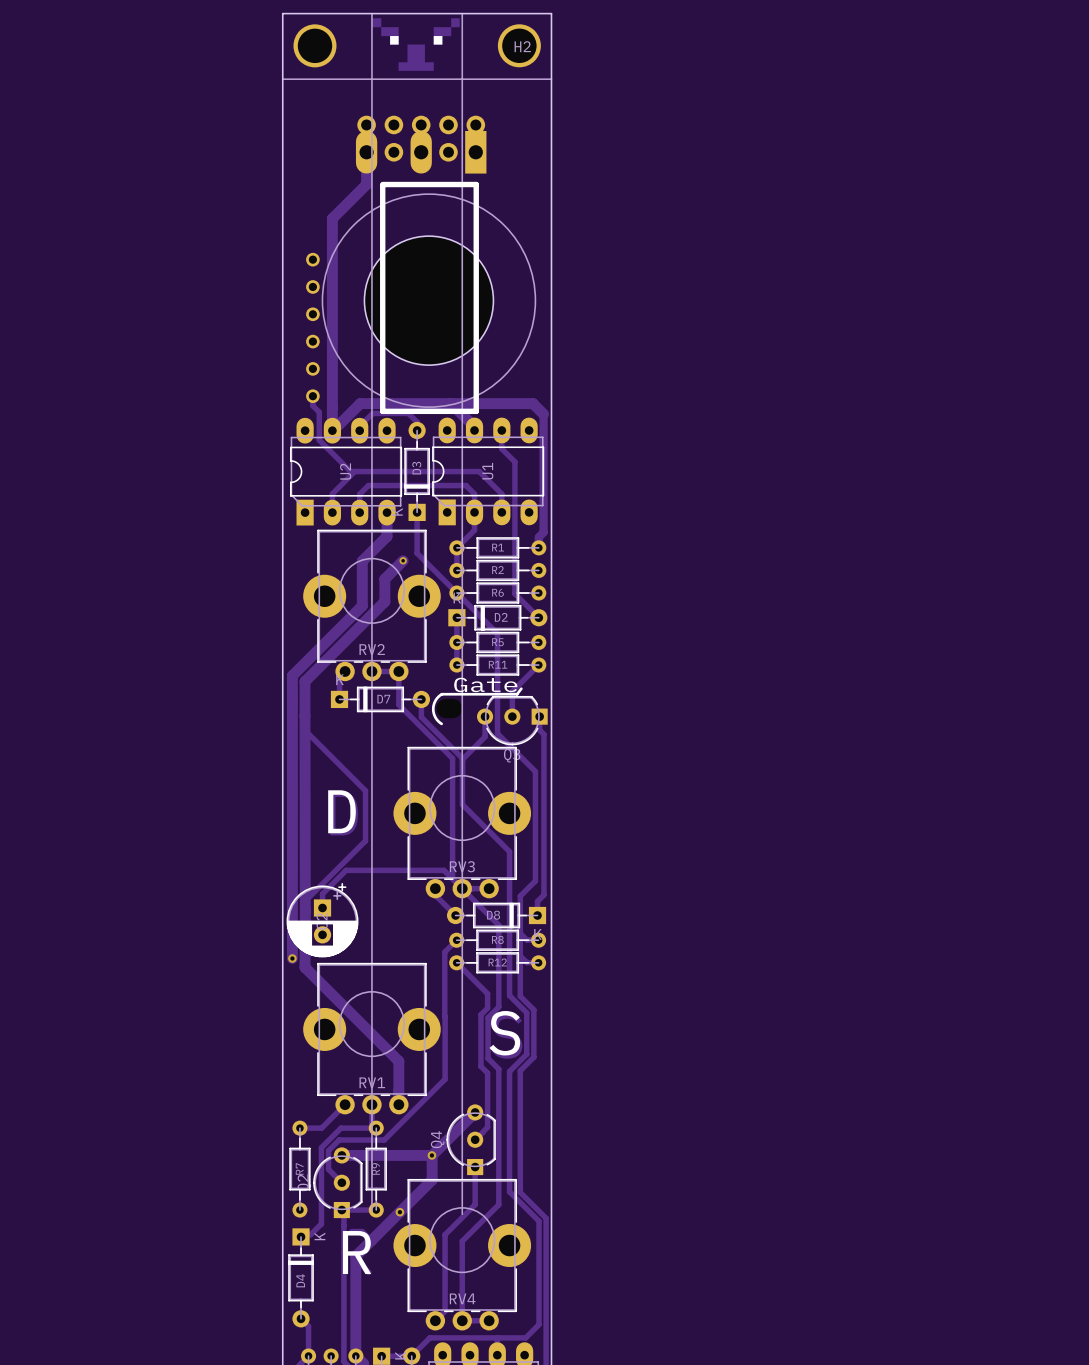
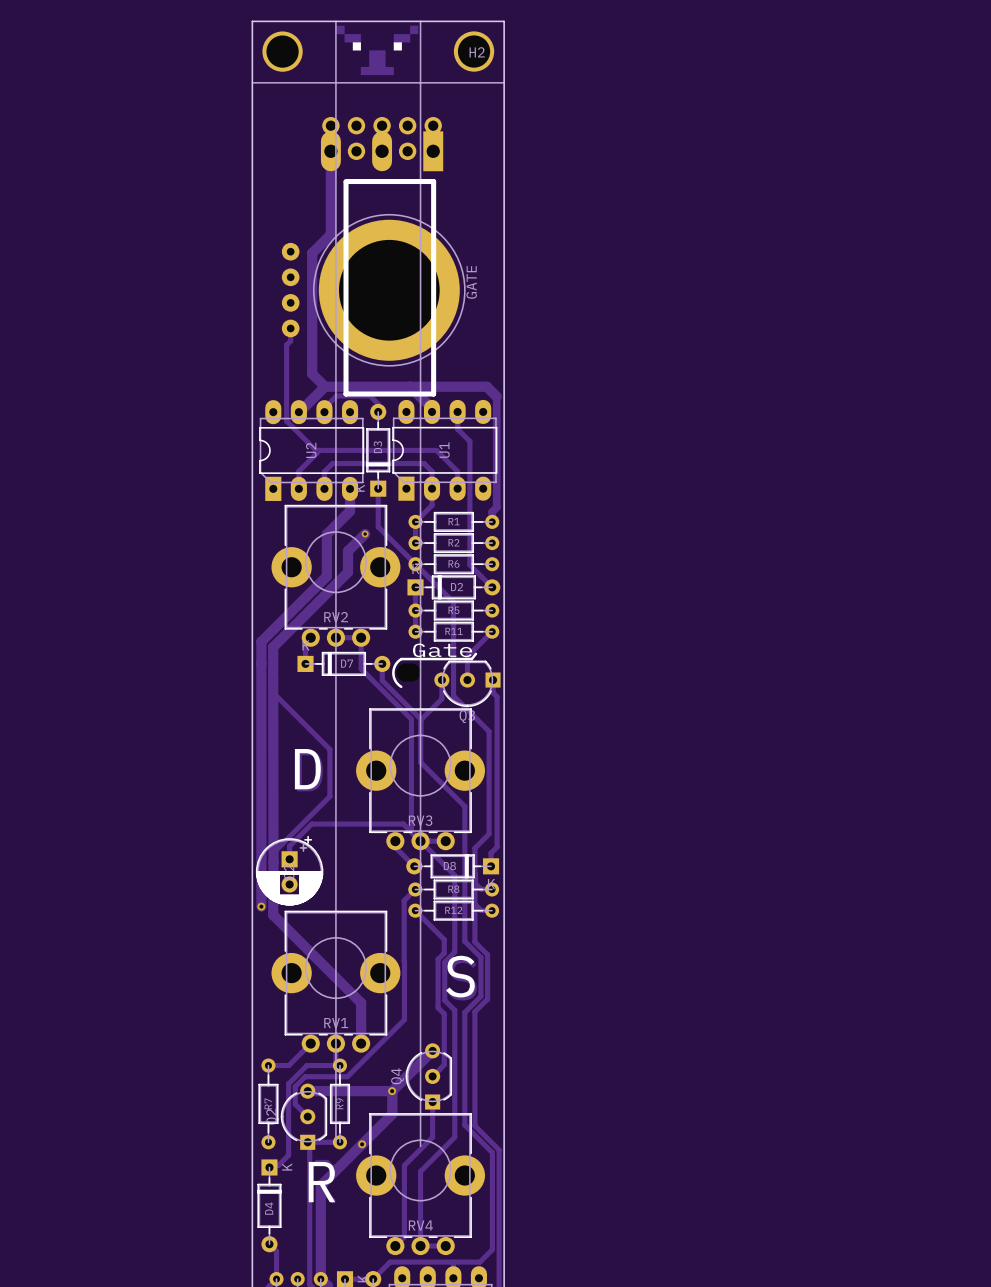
track: (366, 184) (332, 218) (332, 430) -> (330, 181) (330, 234) (312, 253) (312, 373) (325, 386)
part footprint: [306, 193, 537, 408] -> [281, 214, 466, 367]
part value: none -> GATE (471, 282)
track: (312, 396) (312, 405) (319, 412) -> (290, 328) (290, 340) (286, 344) (286, 394)

